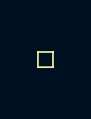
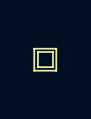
line: none -> (34, 48) (56, 48) (56, 70) (34, 70) (34, 48)

